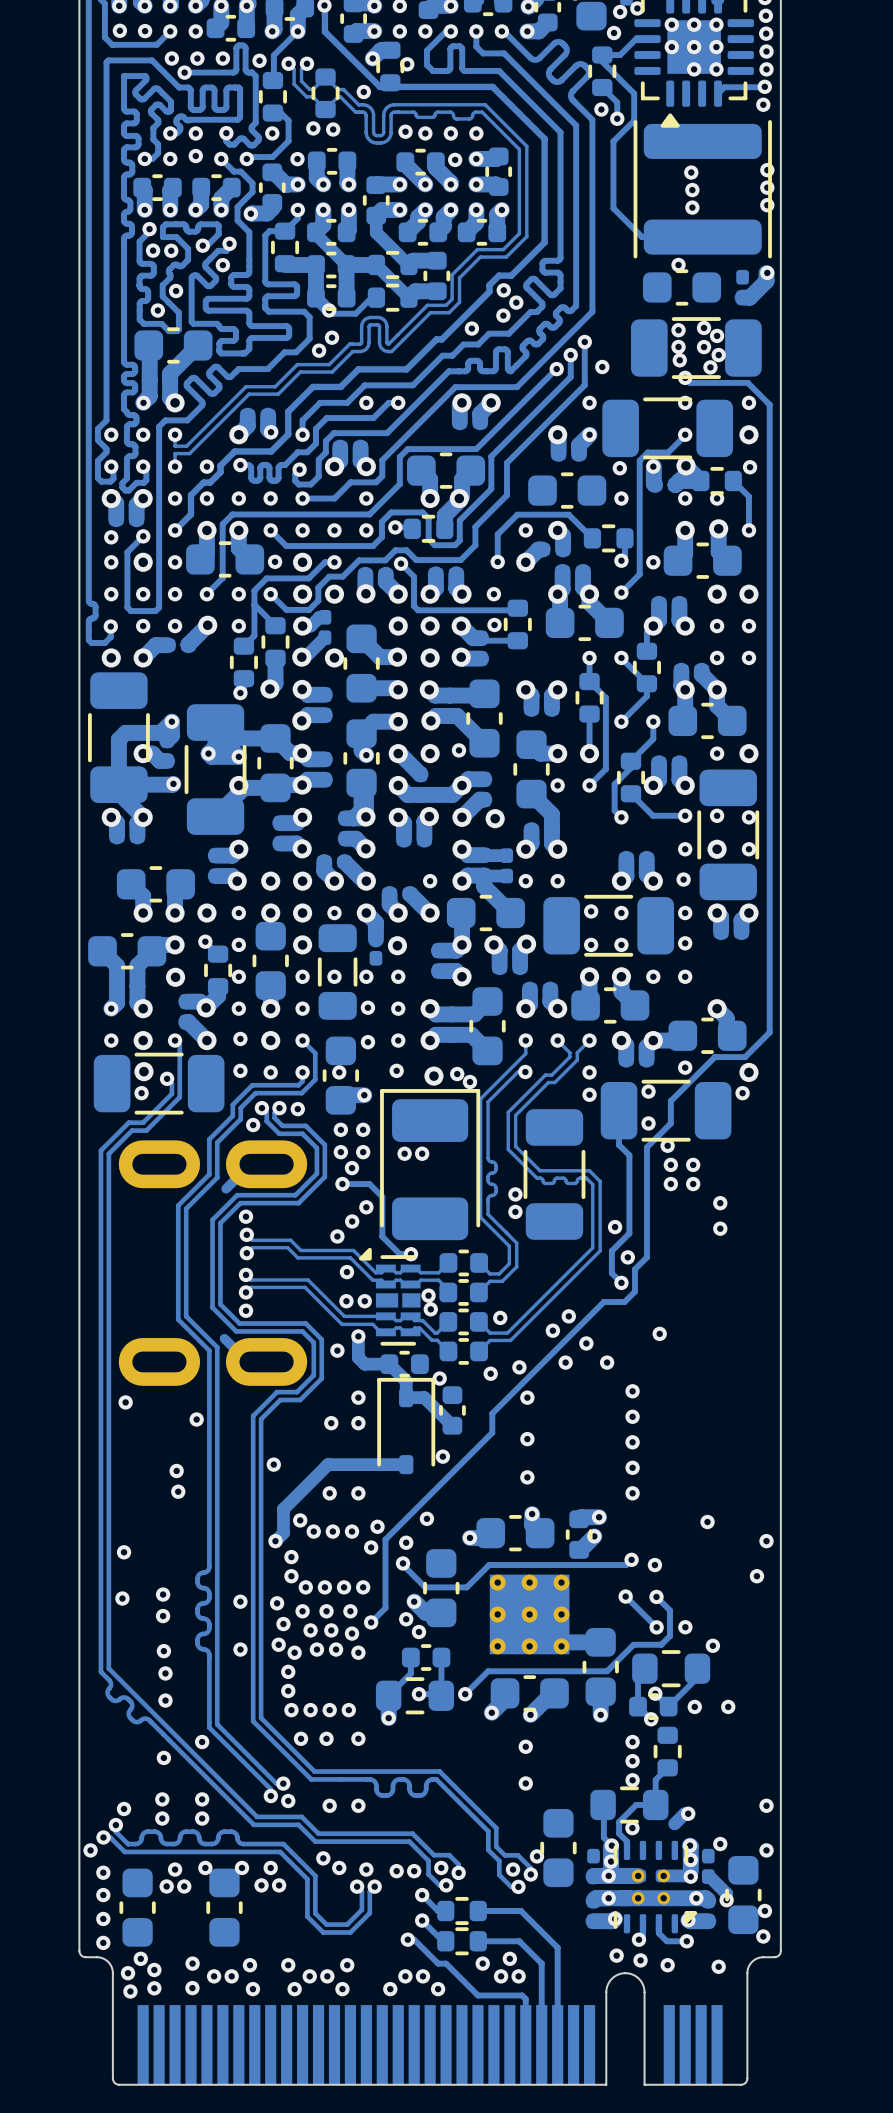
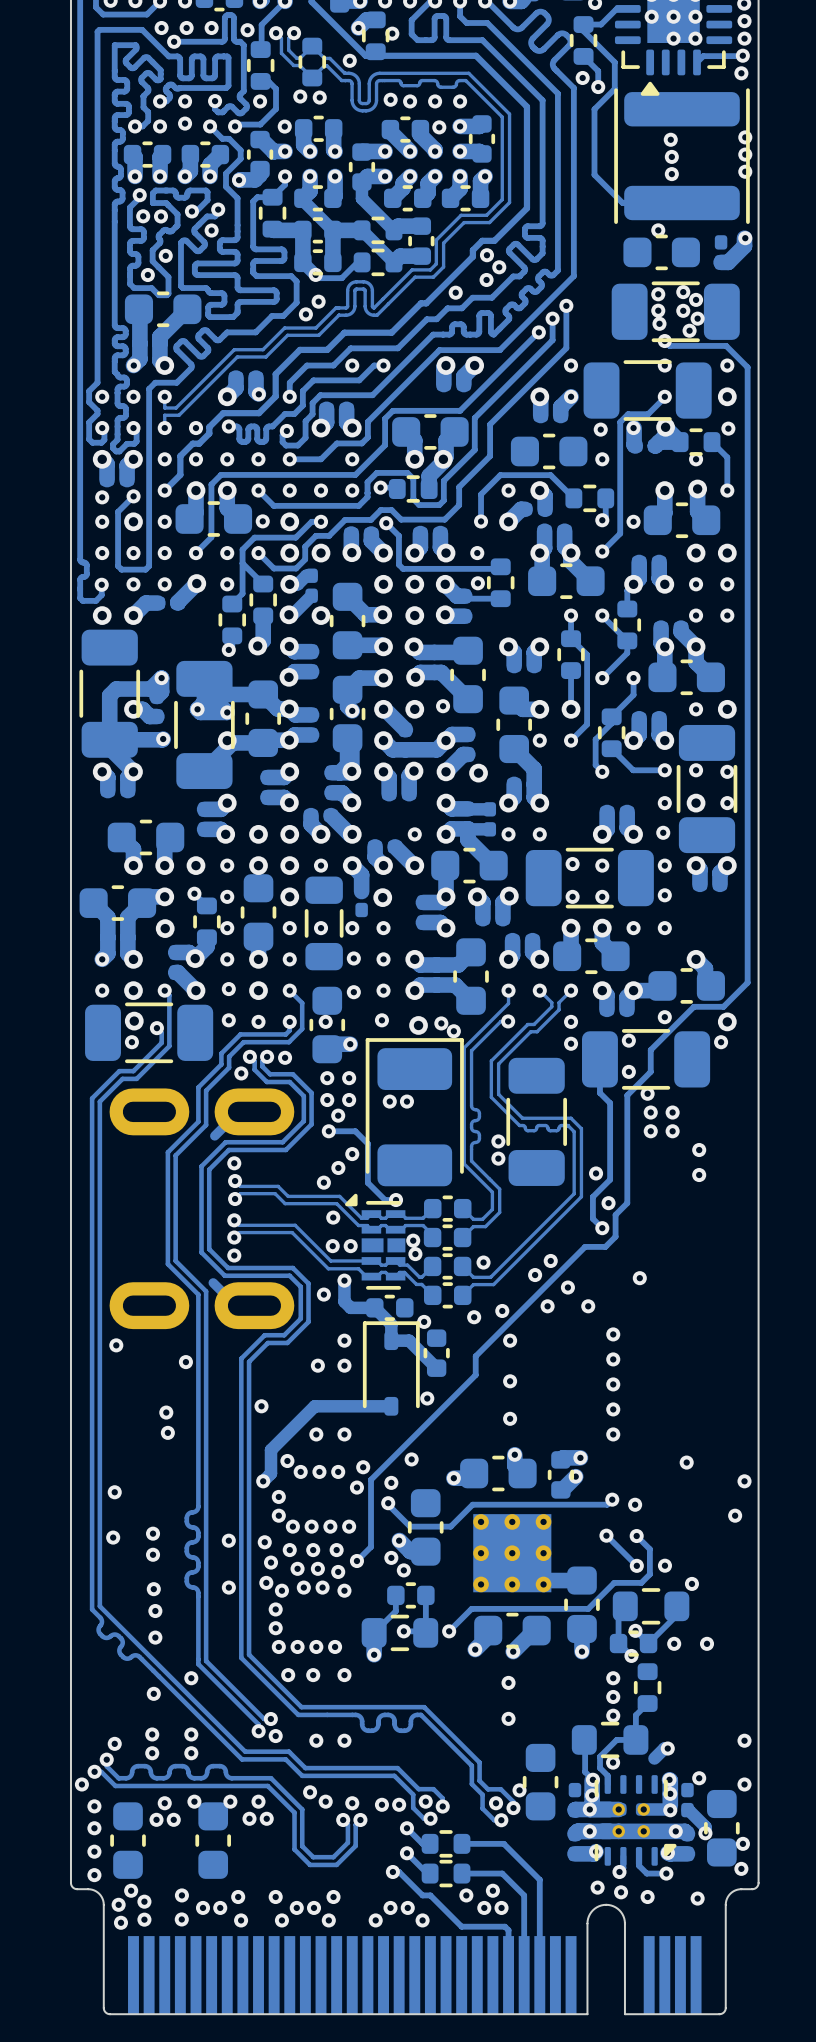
via: (602, 367) -> none
via: (685, 498) -> none

